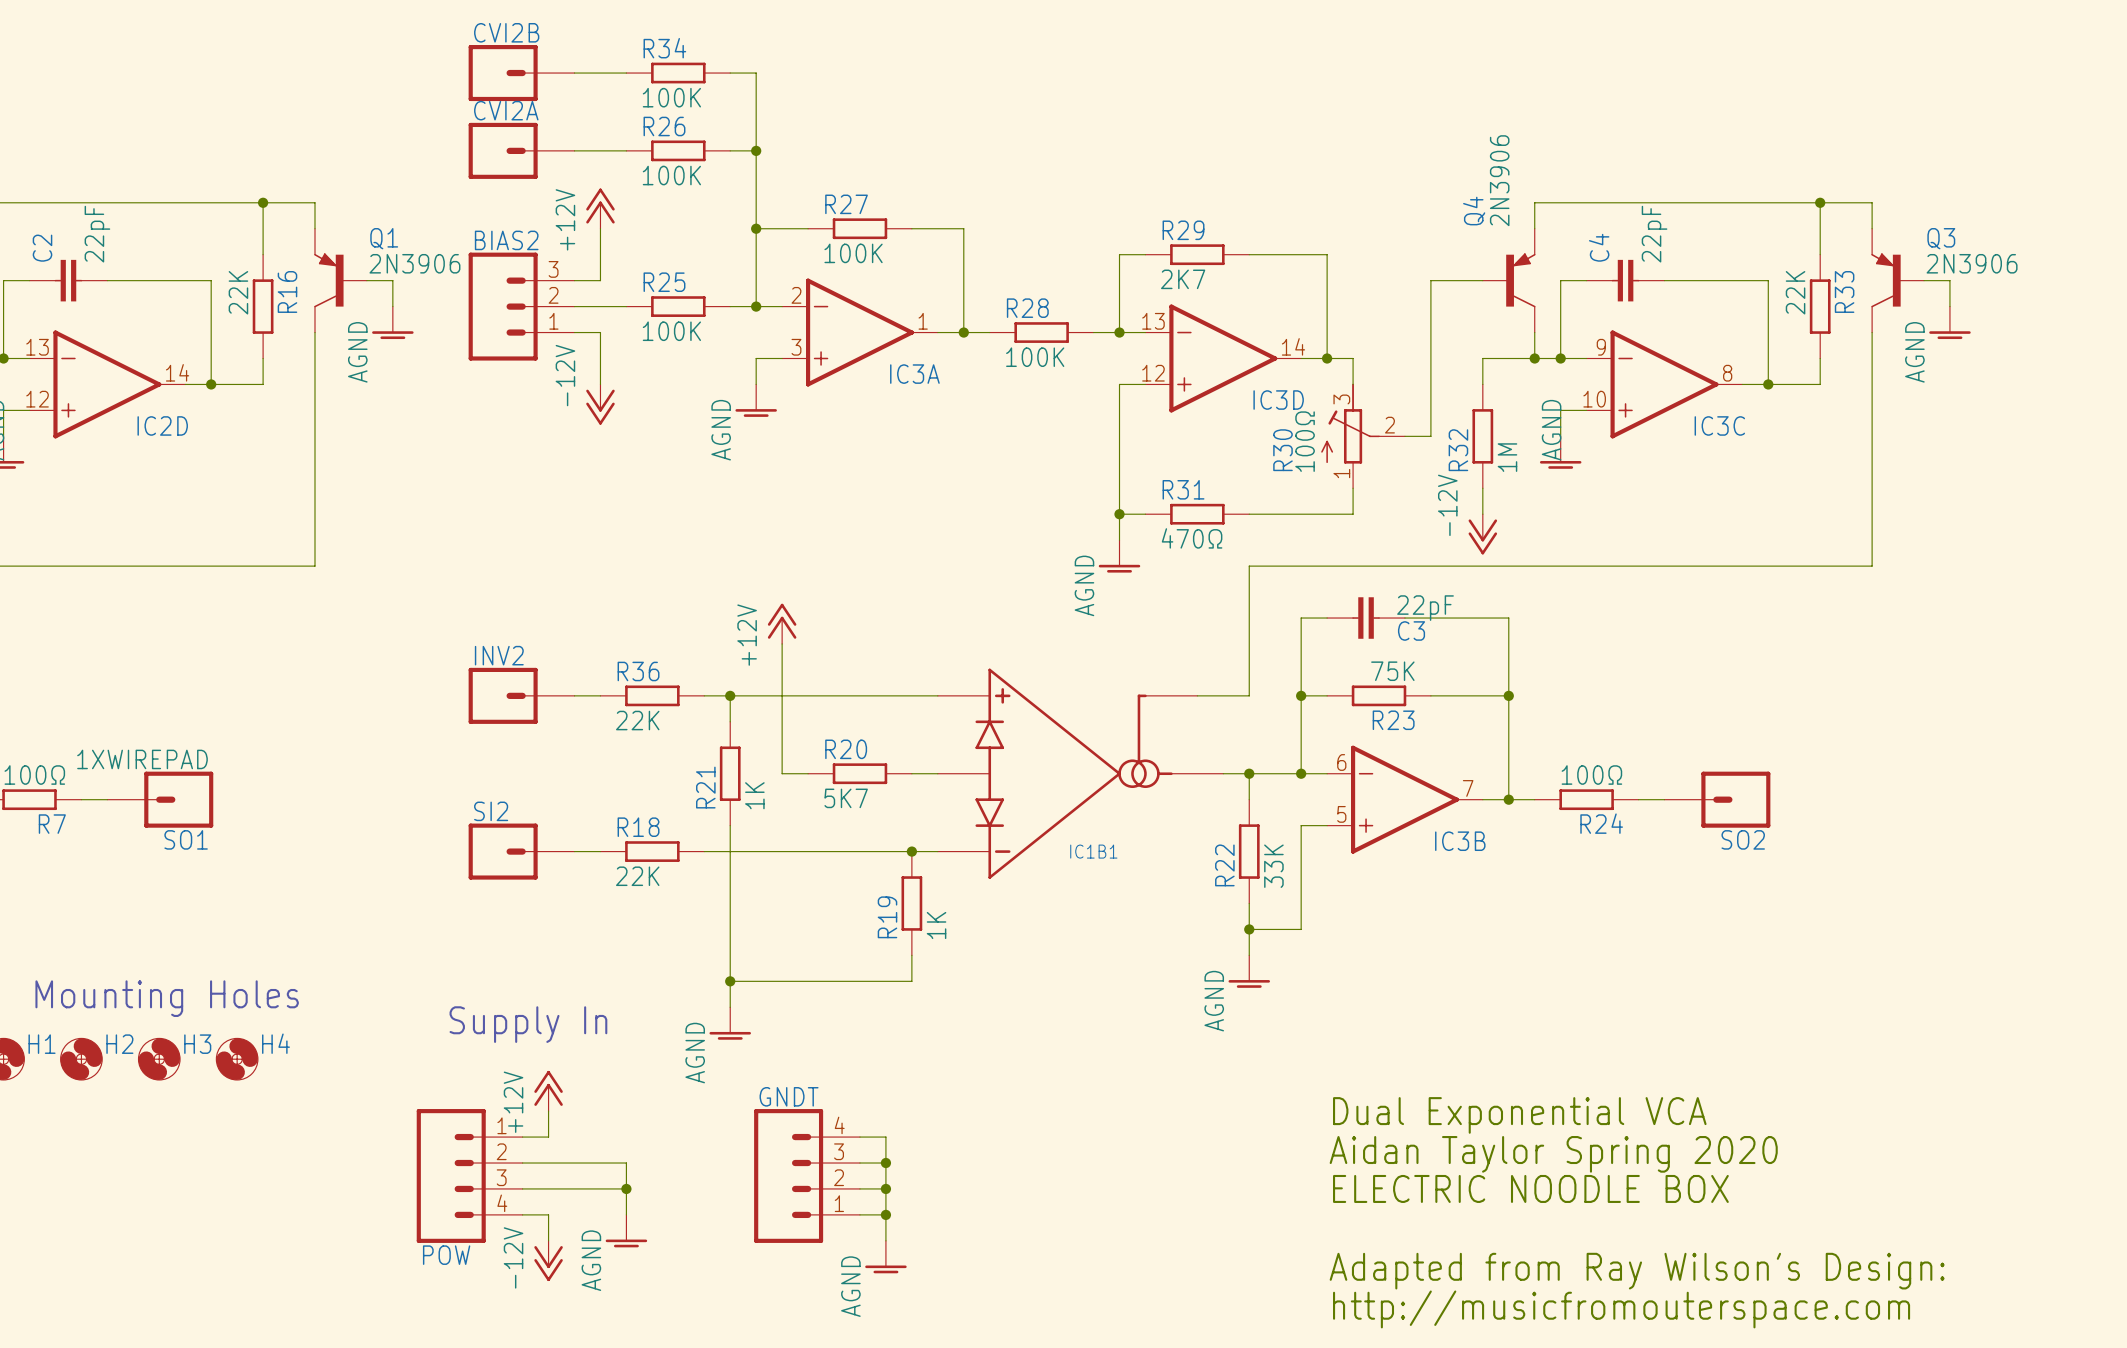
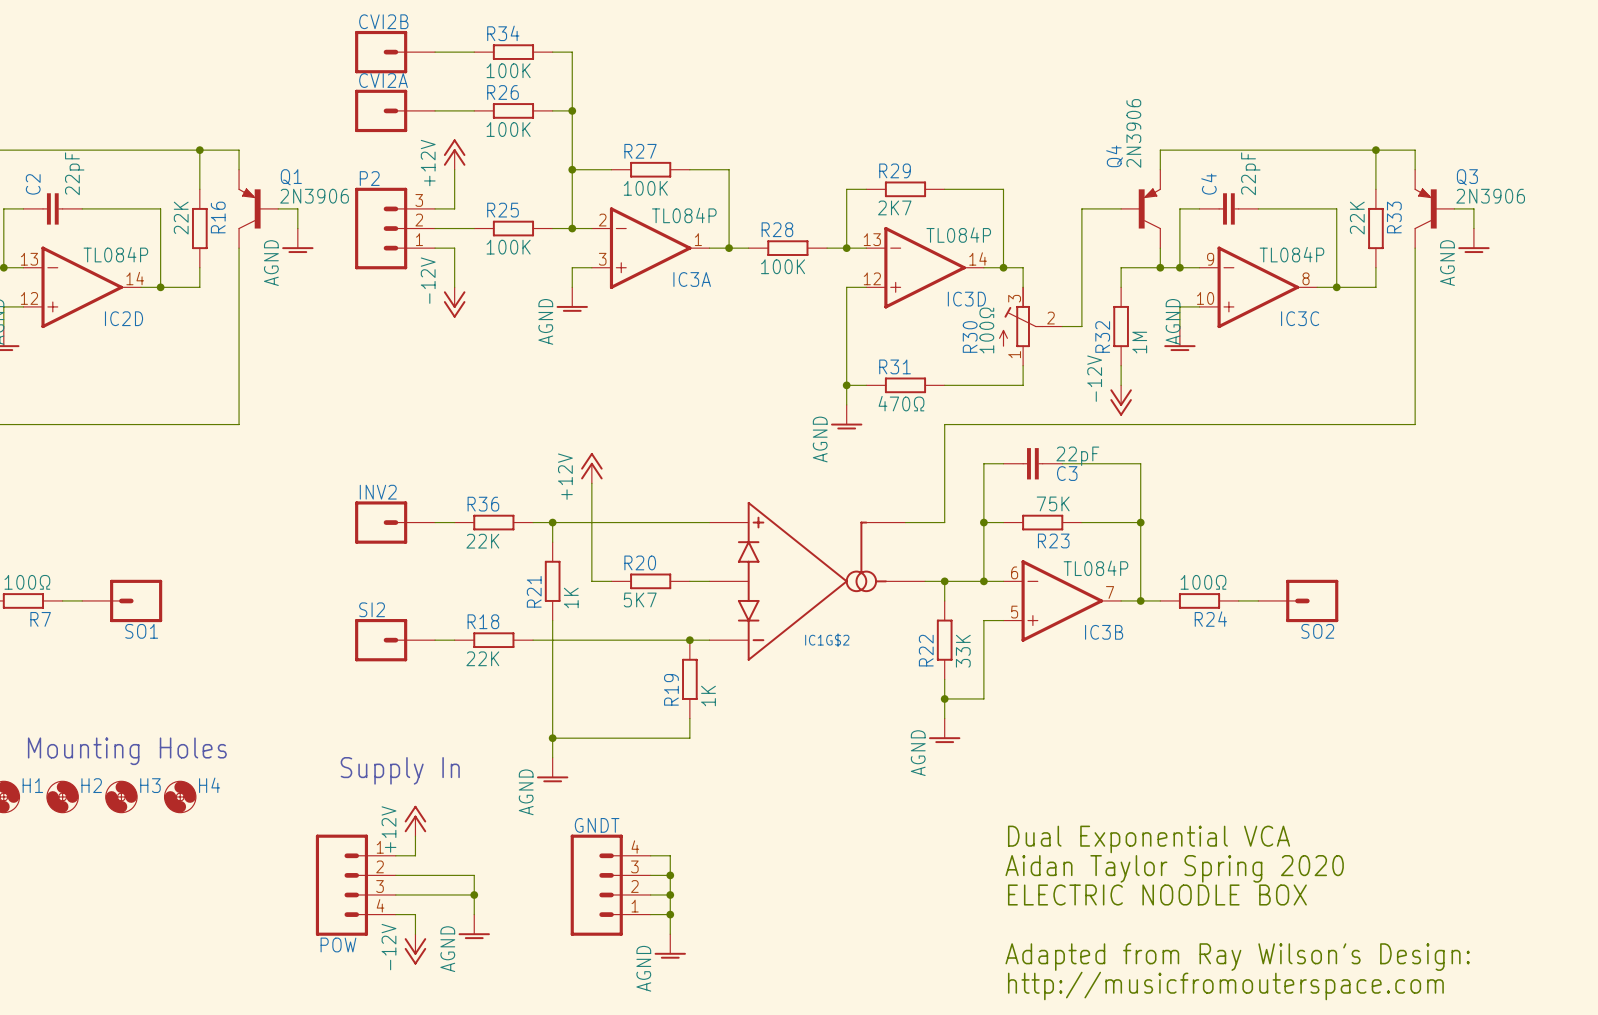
BIAS2 name: BIAS2 (506, 240) -> P2 (369, 178)
IC3A value: none -> TL084P (684, 215)
IC3D value: none -> TL084P (958, 235)
IC2D value: none -> TL084P (115, 254)
IC3C value: none -> TL084P (1291, 254)
IC3B value: none -> TL084P (1095, 568)
SO1 value: 1XWIREPAD (142, 759) -> none
IC1B1 name: IC1B1 (1093, 851) -> IC1G$2 (827, 640)

